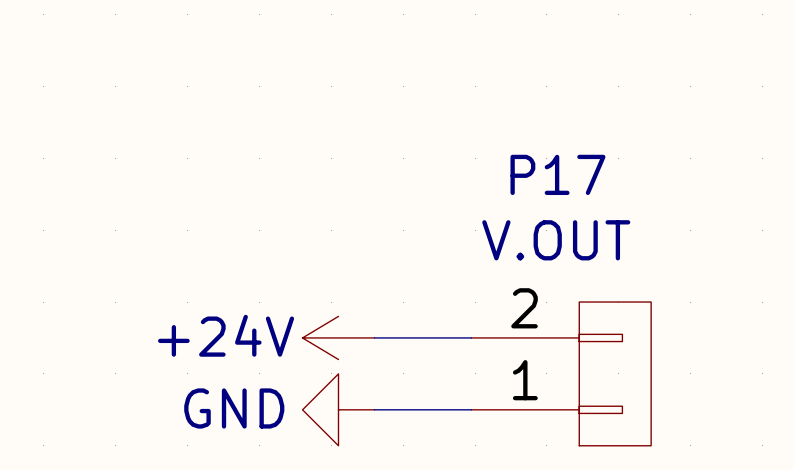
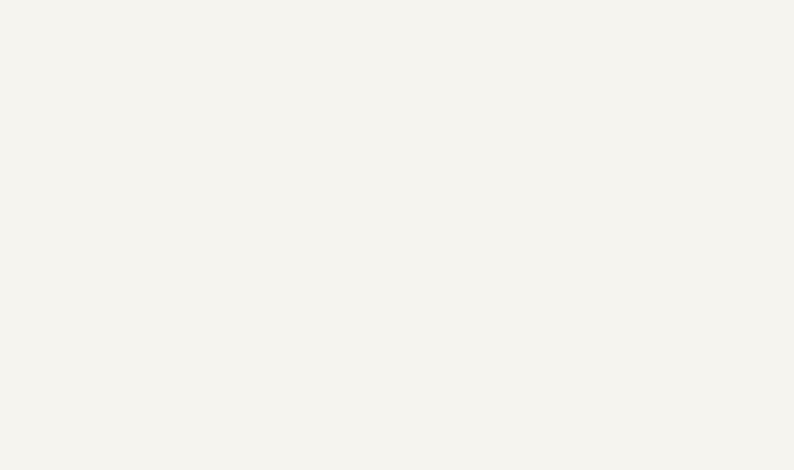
power symbol: +24V (338, 337) -> none
wire: (374, 337) (471, 337) -> none
P17: V.OUT (561, 373) -> none
power symbol: GND (338, 409) -> none
wire: (374, 409) (471, 409) -> none

